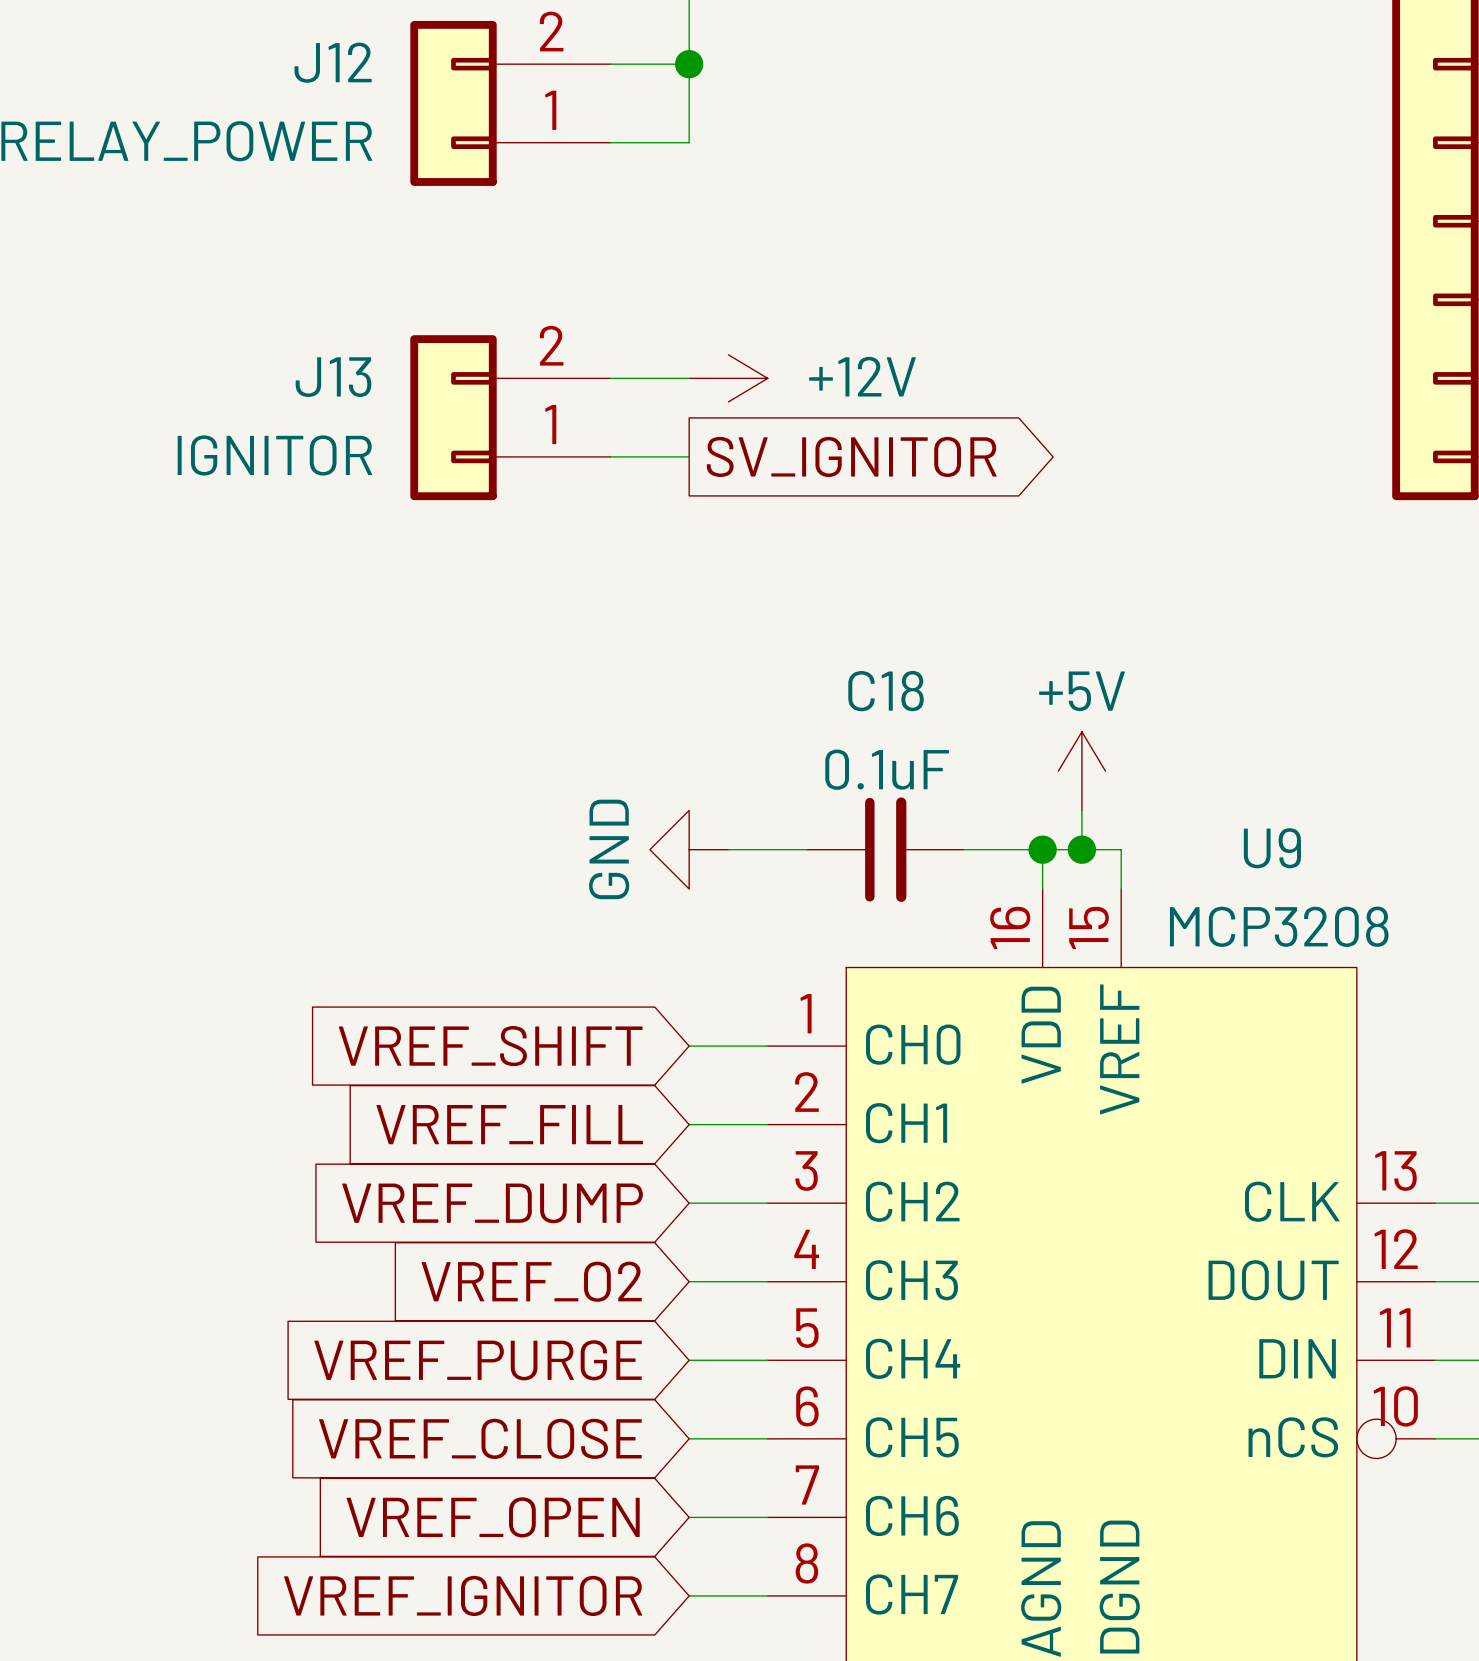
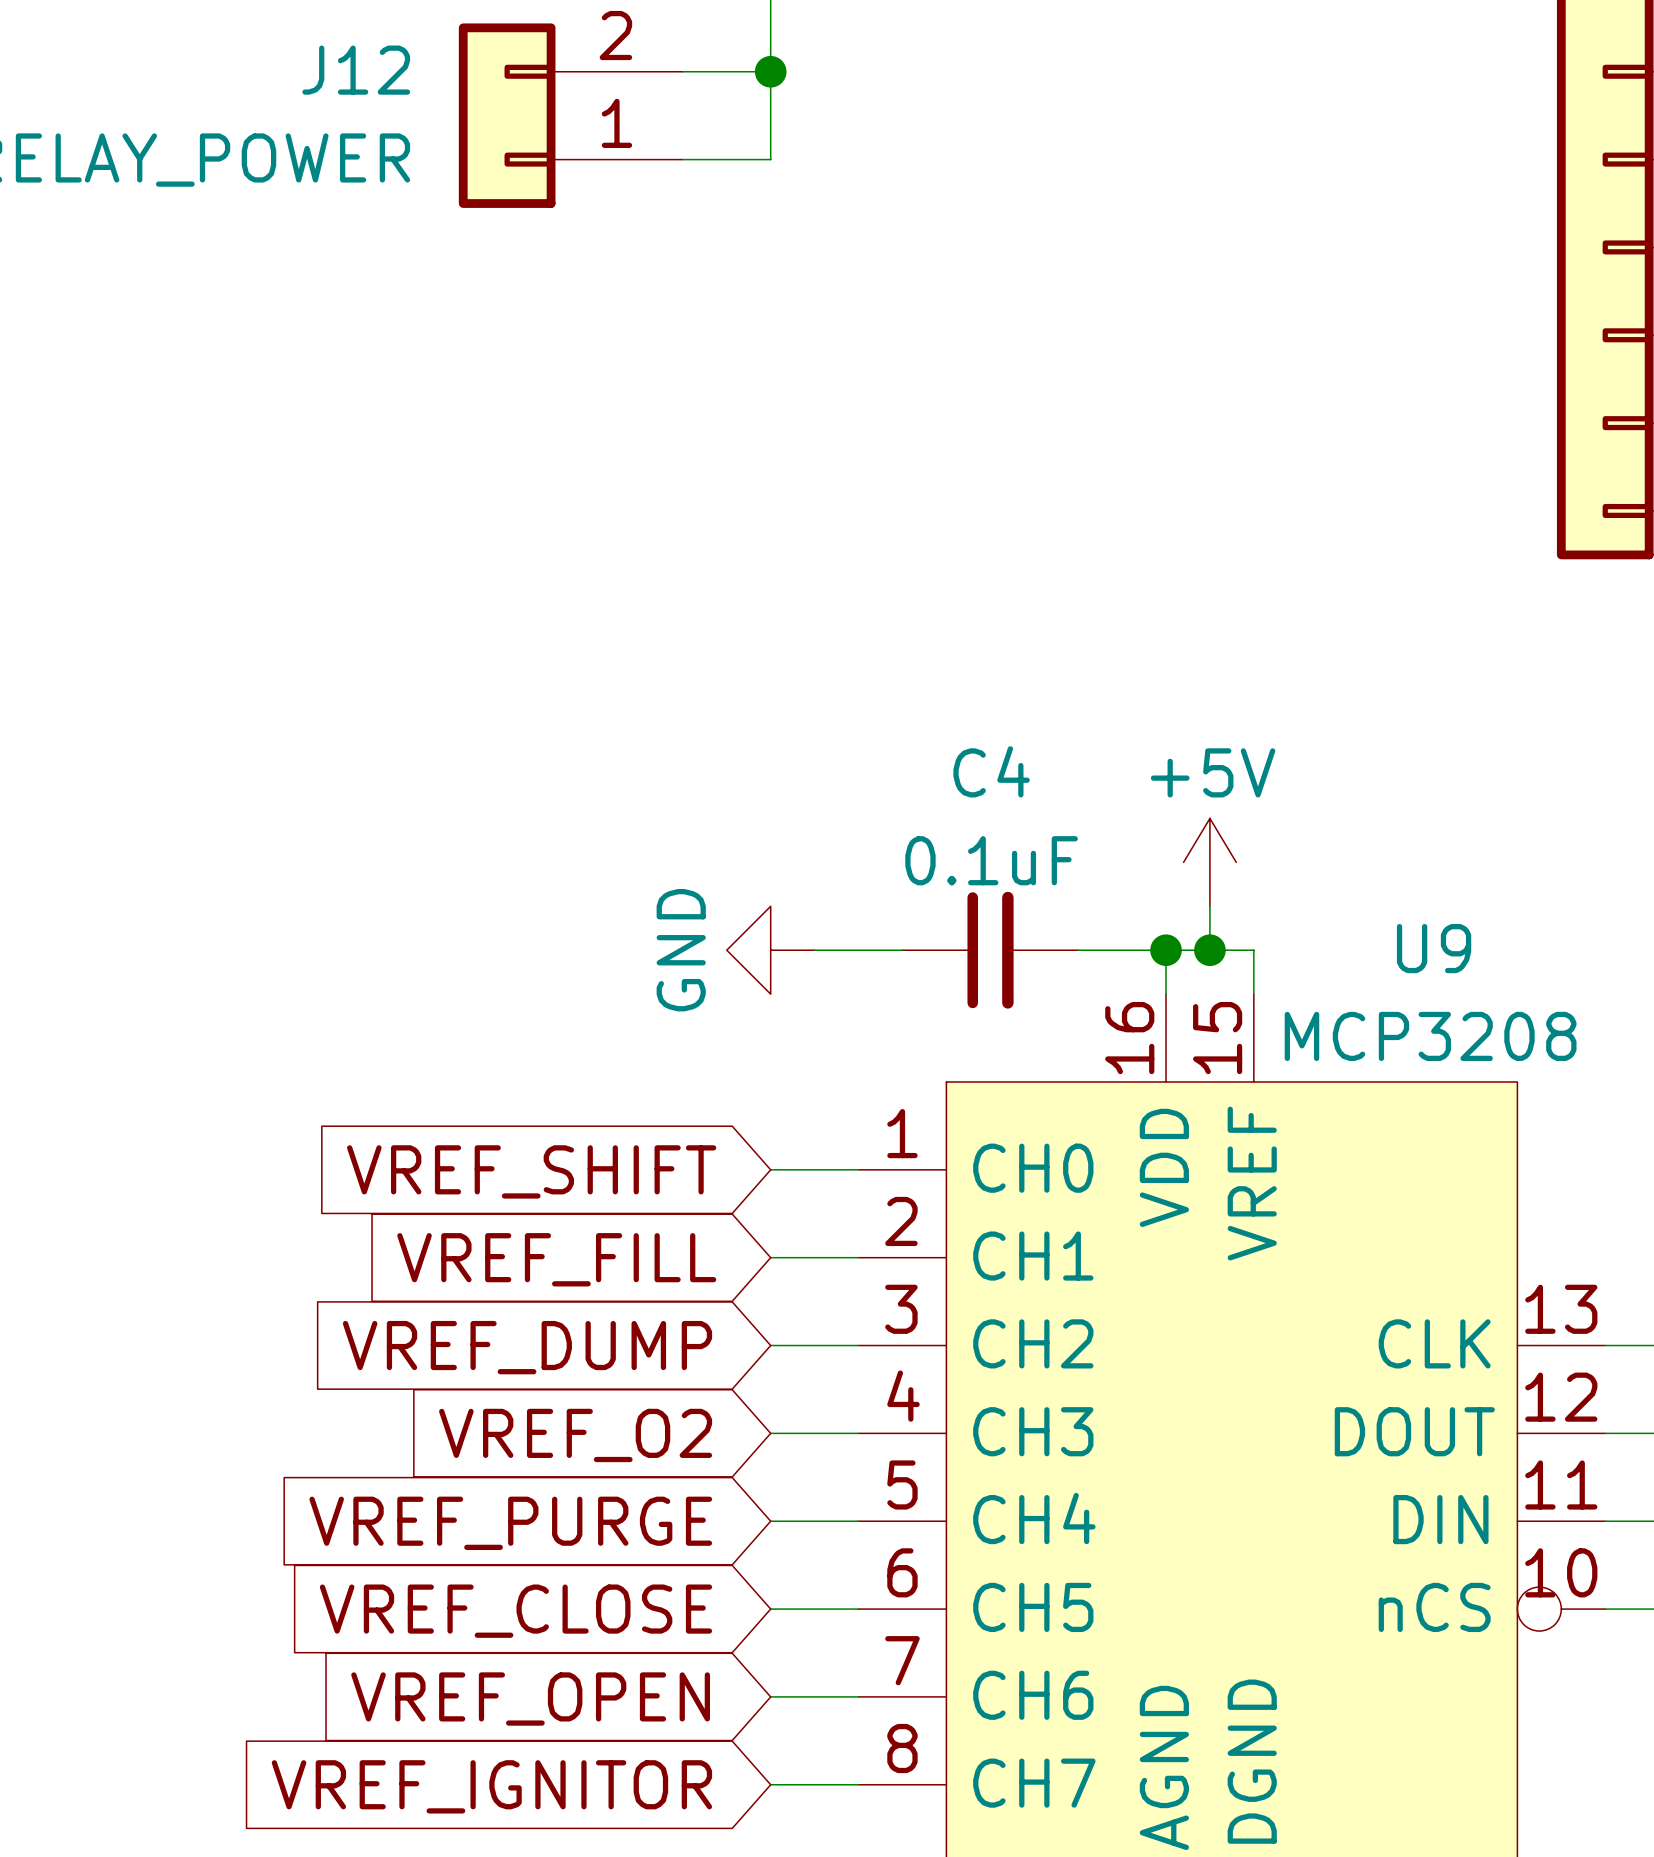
wire: (610, 378) (689, 378) -> none
power symbol: +12V (728, 378) -> none
J13: IGNITOR (510, 417) -> none
wire: (610, 456) (689, 456) -> none
global label: SV_IGNITOR (851, 456) -> none
C18 name: C18 (886, 691) -> C4 (991, 771)

